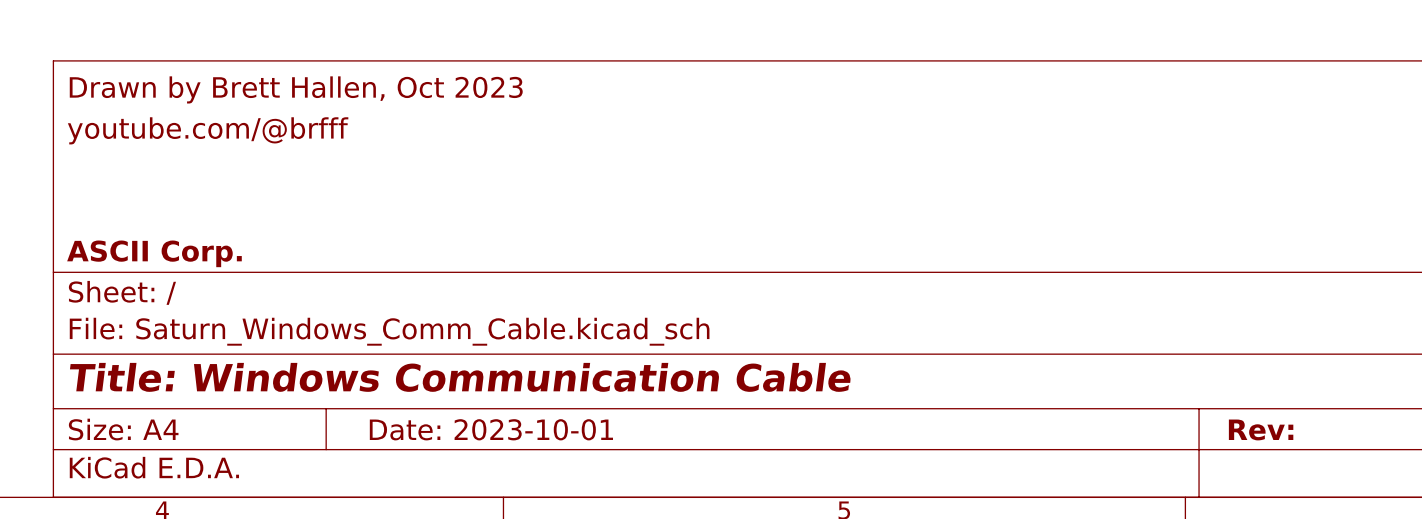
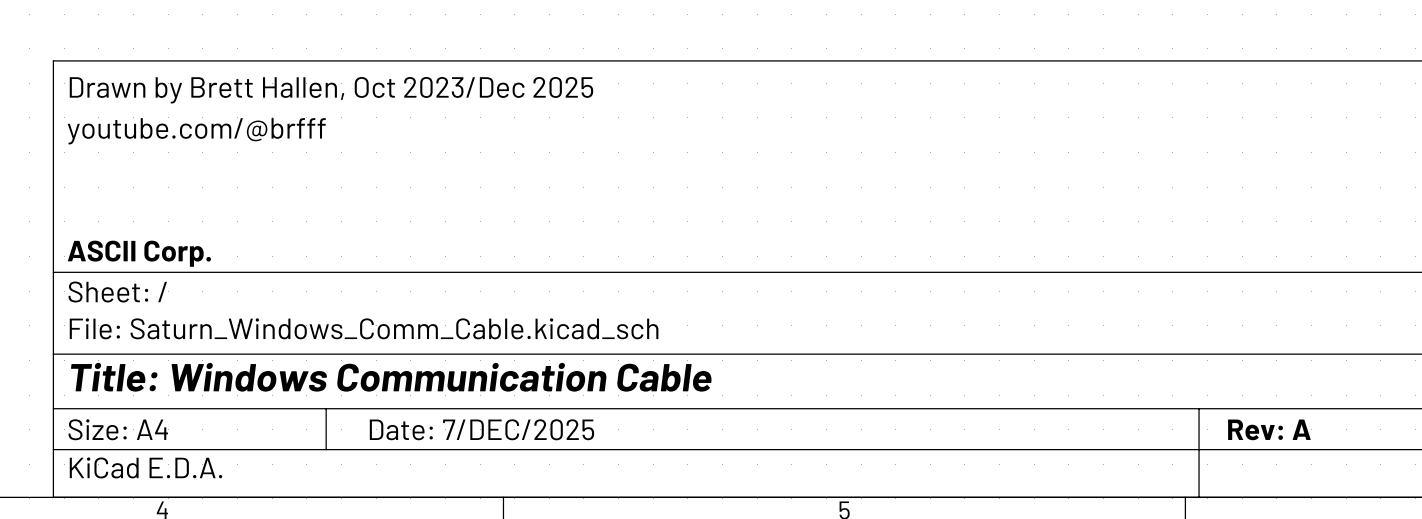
title block: Drawn by Brett Hallen, Oct 2023 (296, 89) -> Drawn by Brett Hallen, Oct 2023/Dec 2025 (331, 90)
title block: Date: 2023-10-01 (491, 429) -> Date: 7/DEC/2025 (481, 429)
title block: Rev: (1261, 429) -> Rev: A (1269, 429)

